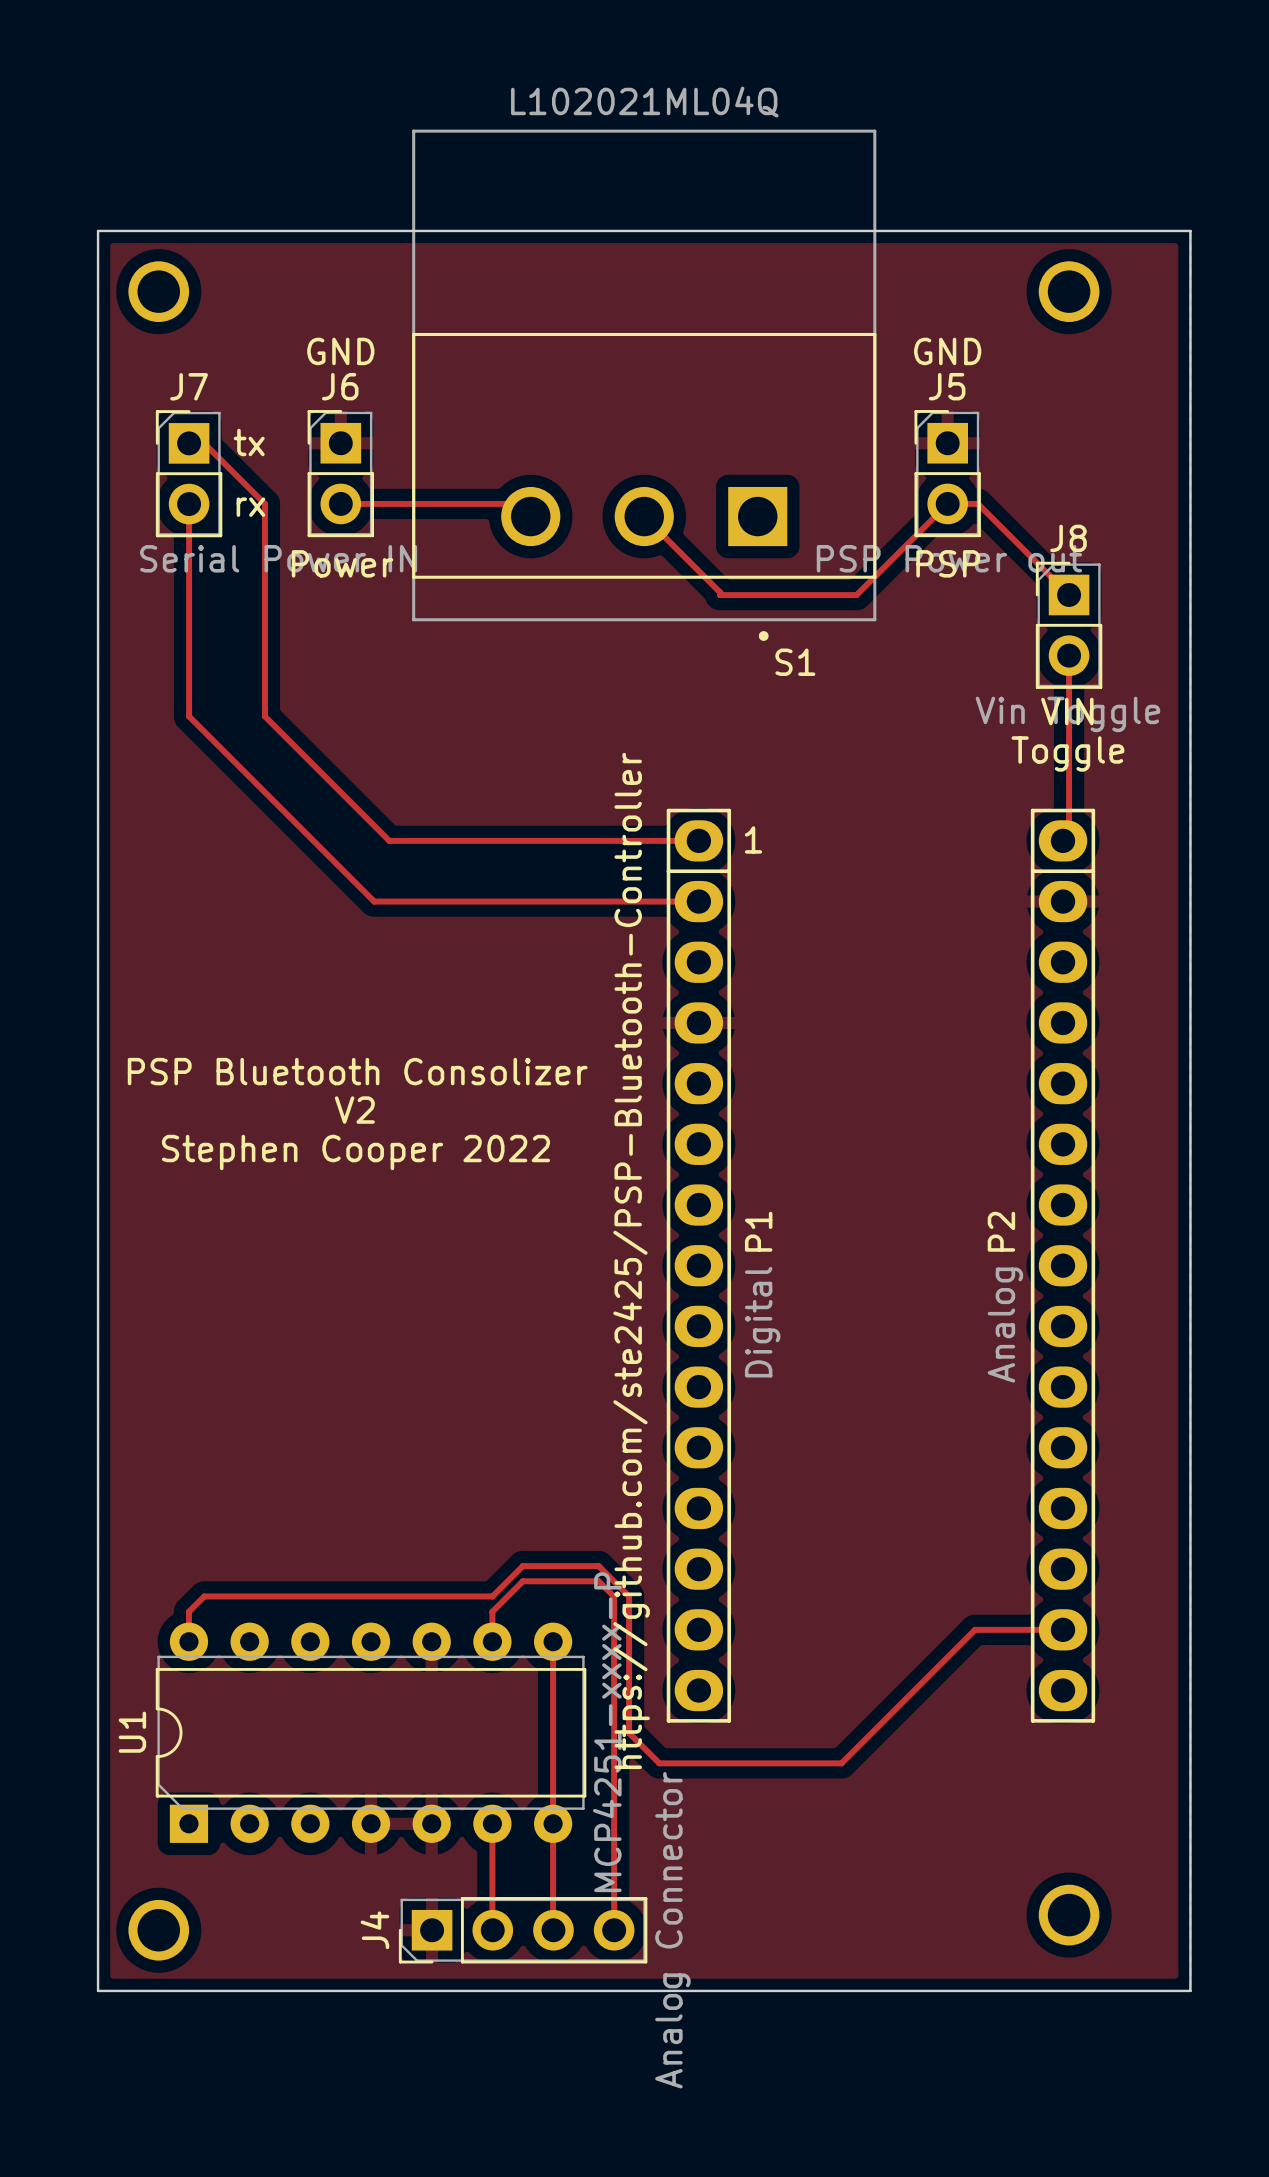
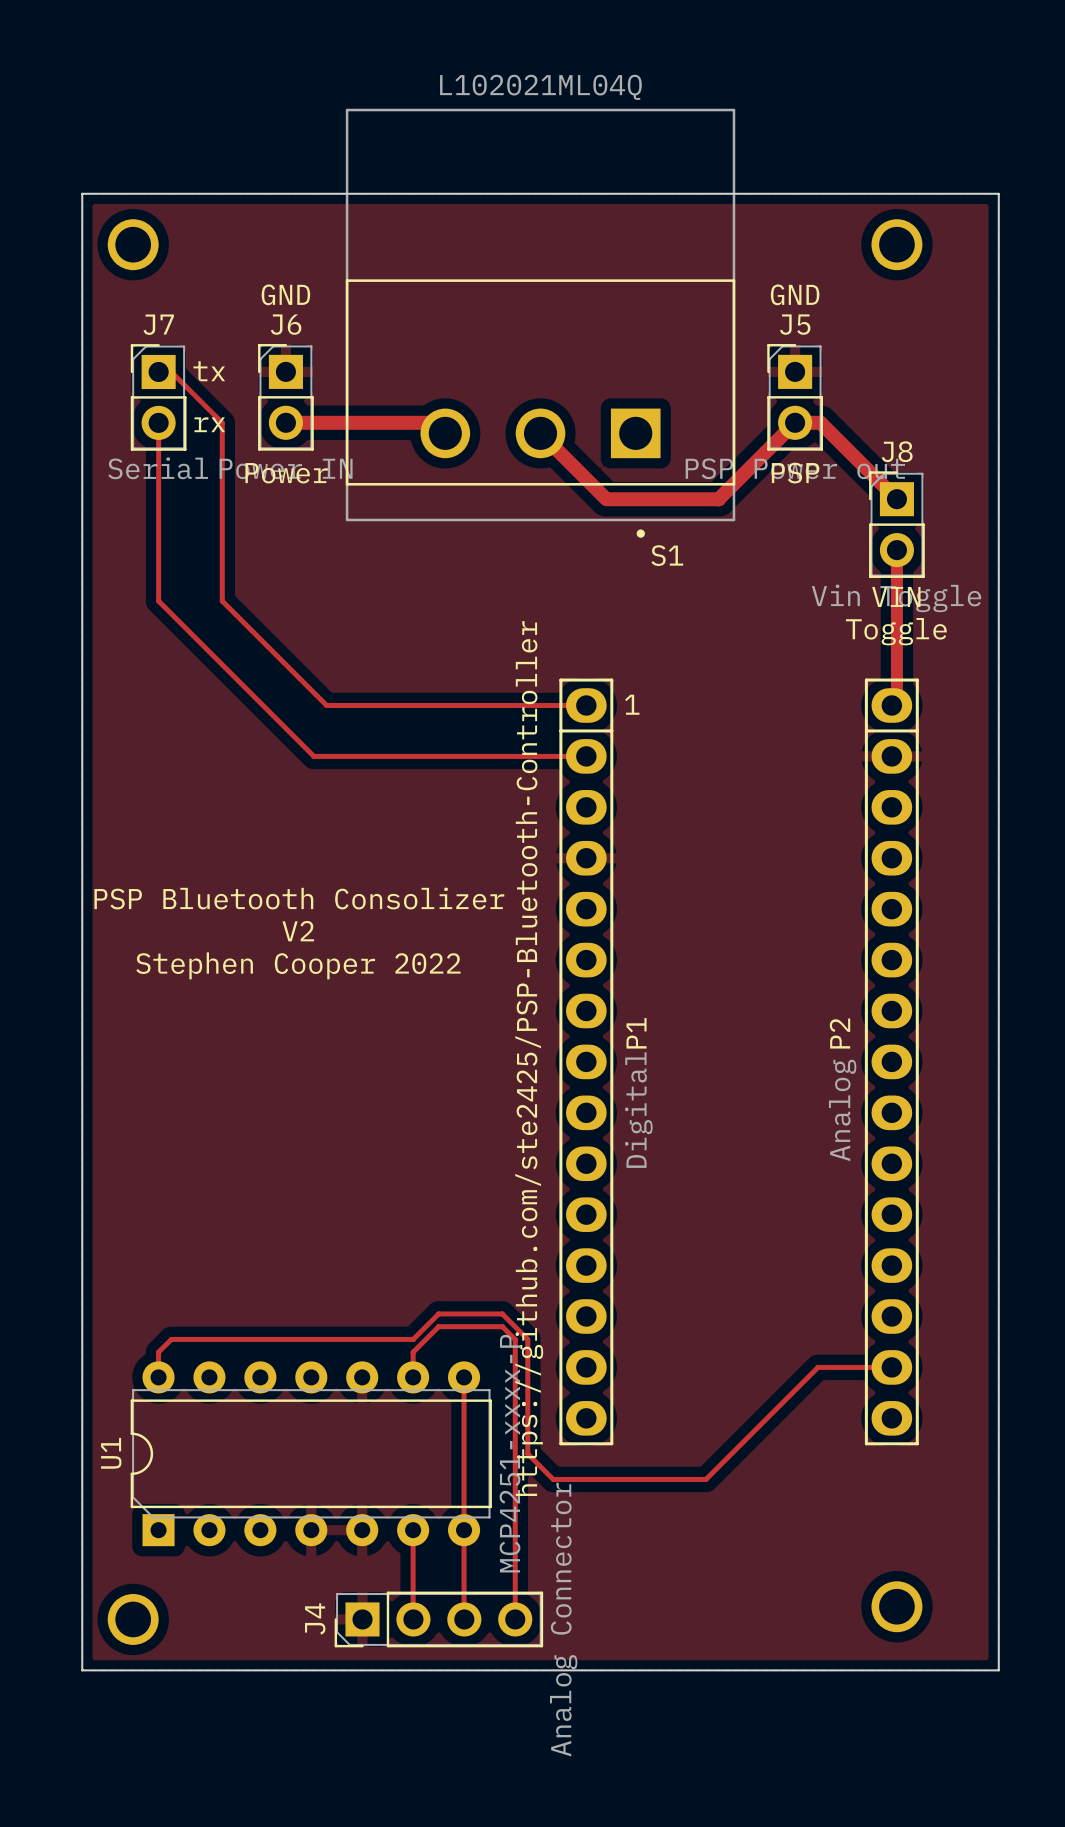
track width: thin (340, 503) (518, 503) (530, 516) -> thick (285, 422) (434, 422) (445, 433)
track width: thin (644, 516) (720, 592) -> thick (540, 433) (604, 497)
track width: thin (1069, 594) (978, 503) (947, 503) (856, 595) (722, 595) -> thick (896, 499) (820, 422) (795, 422) (718, 499) (606, 499)
track width: thin (1069, 655) (1069, 834) (1063, 840) -> thick (896, 550) (896, 700) (891, 705)

